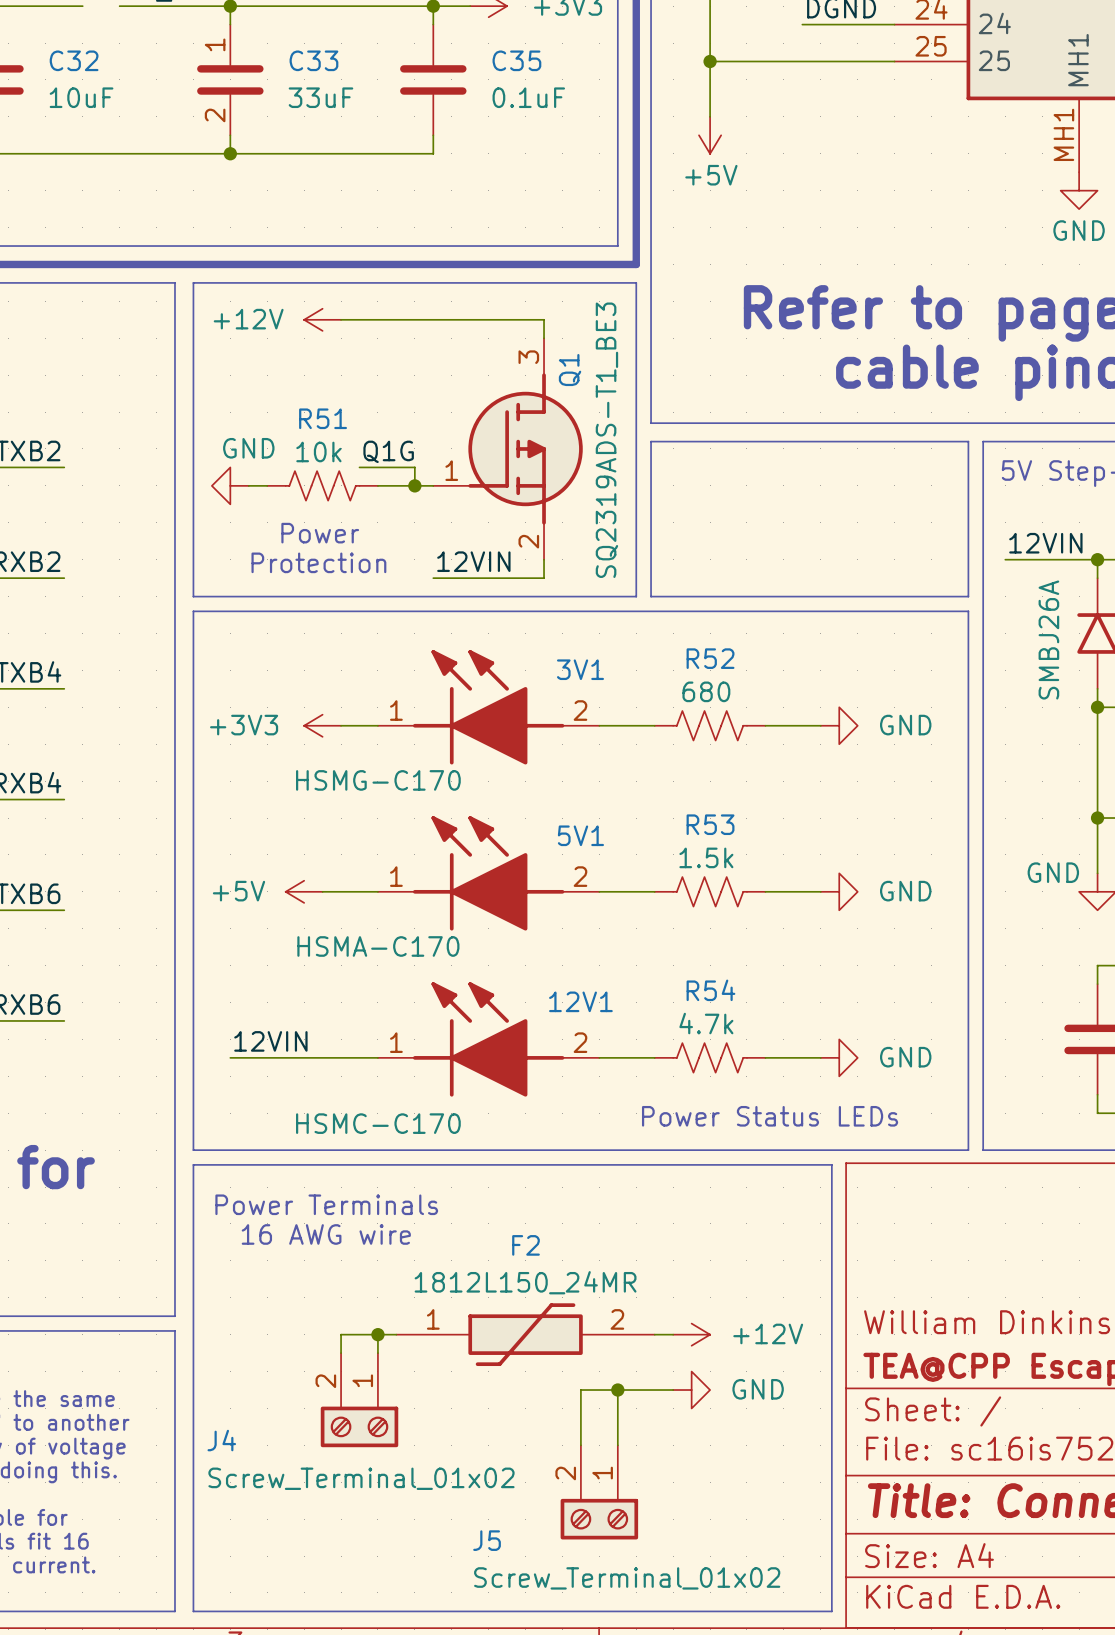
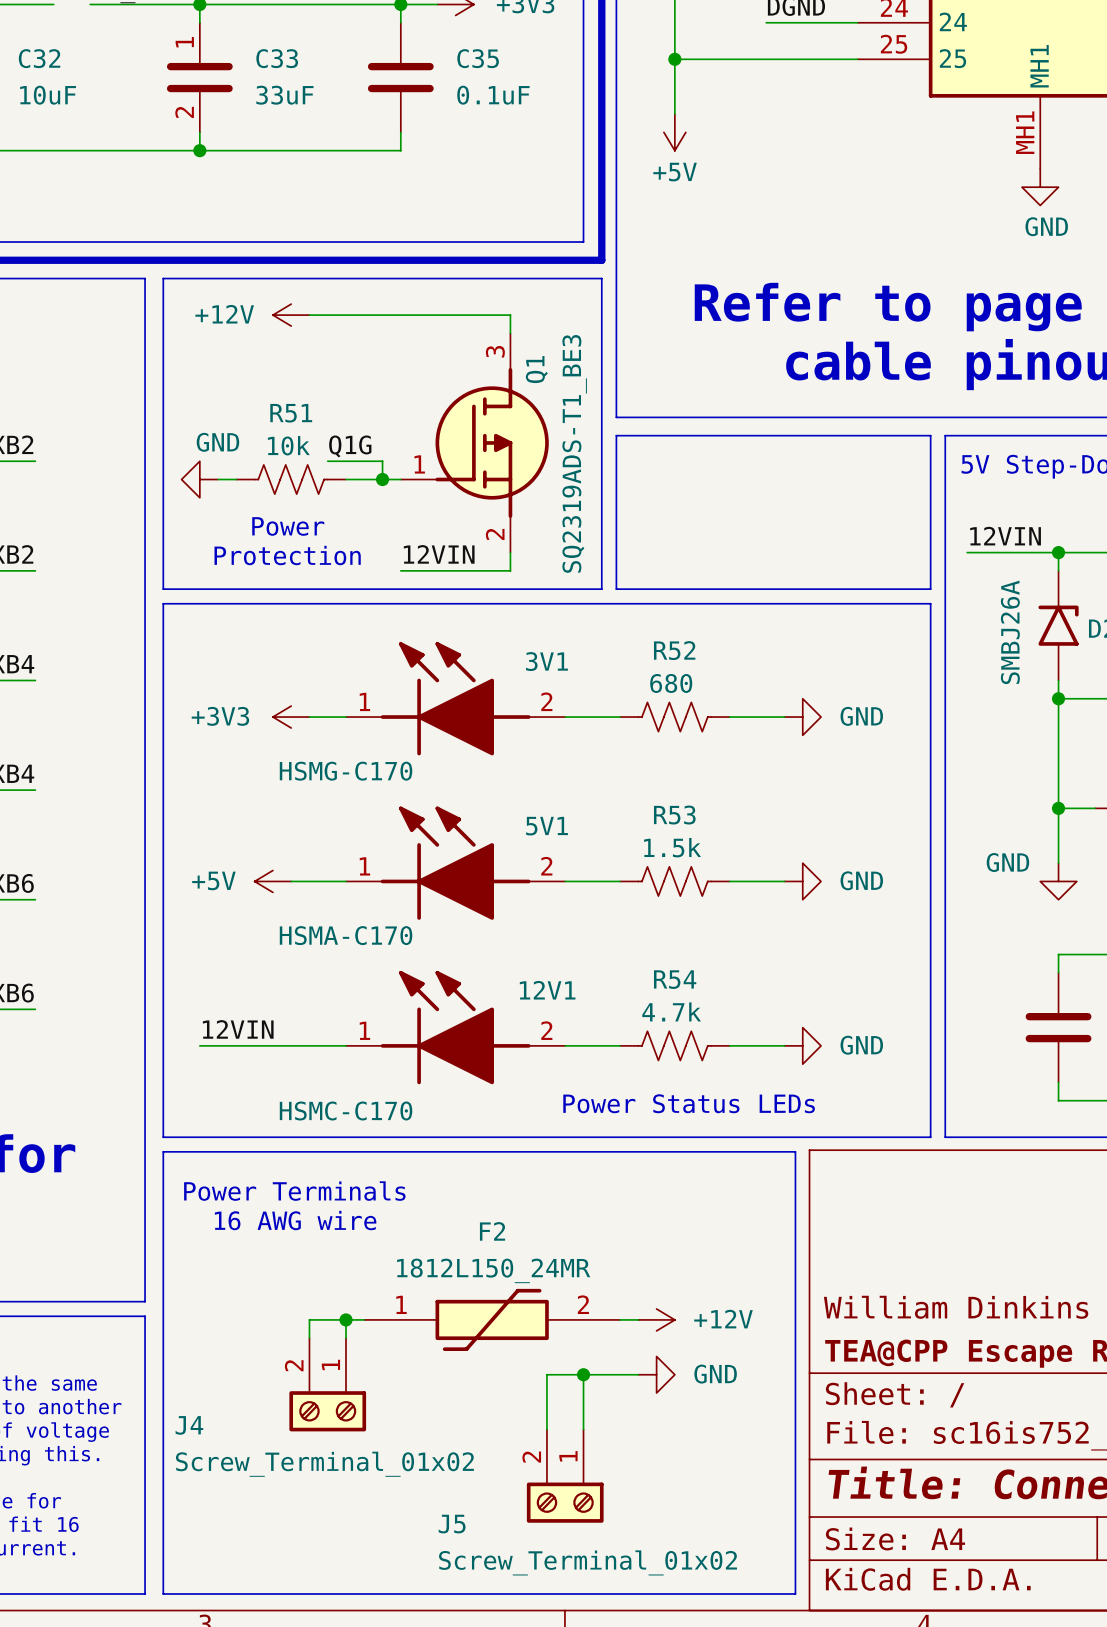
text position: Power Status LEDs (770, 1116) -> Power Status LEDs (689, 1103)

